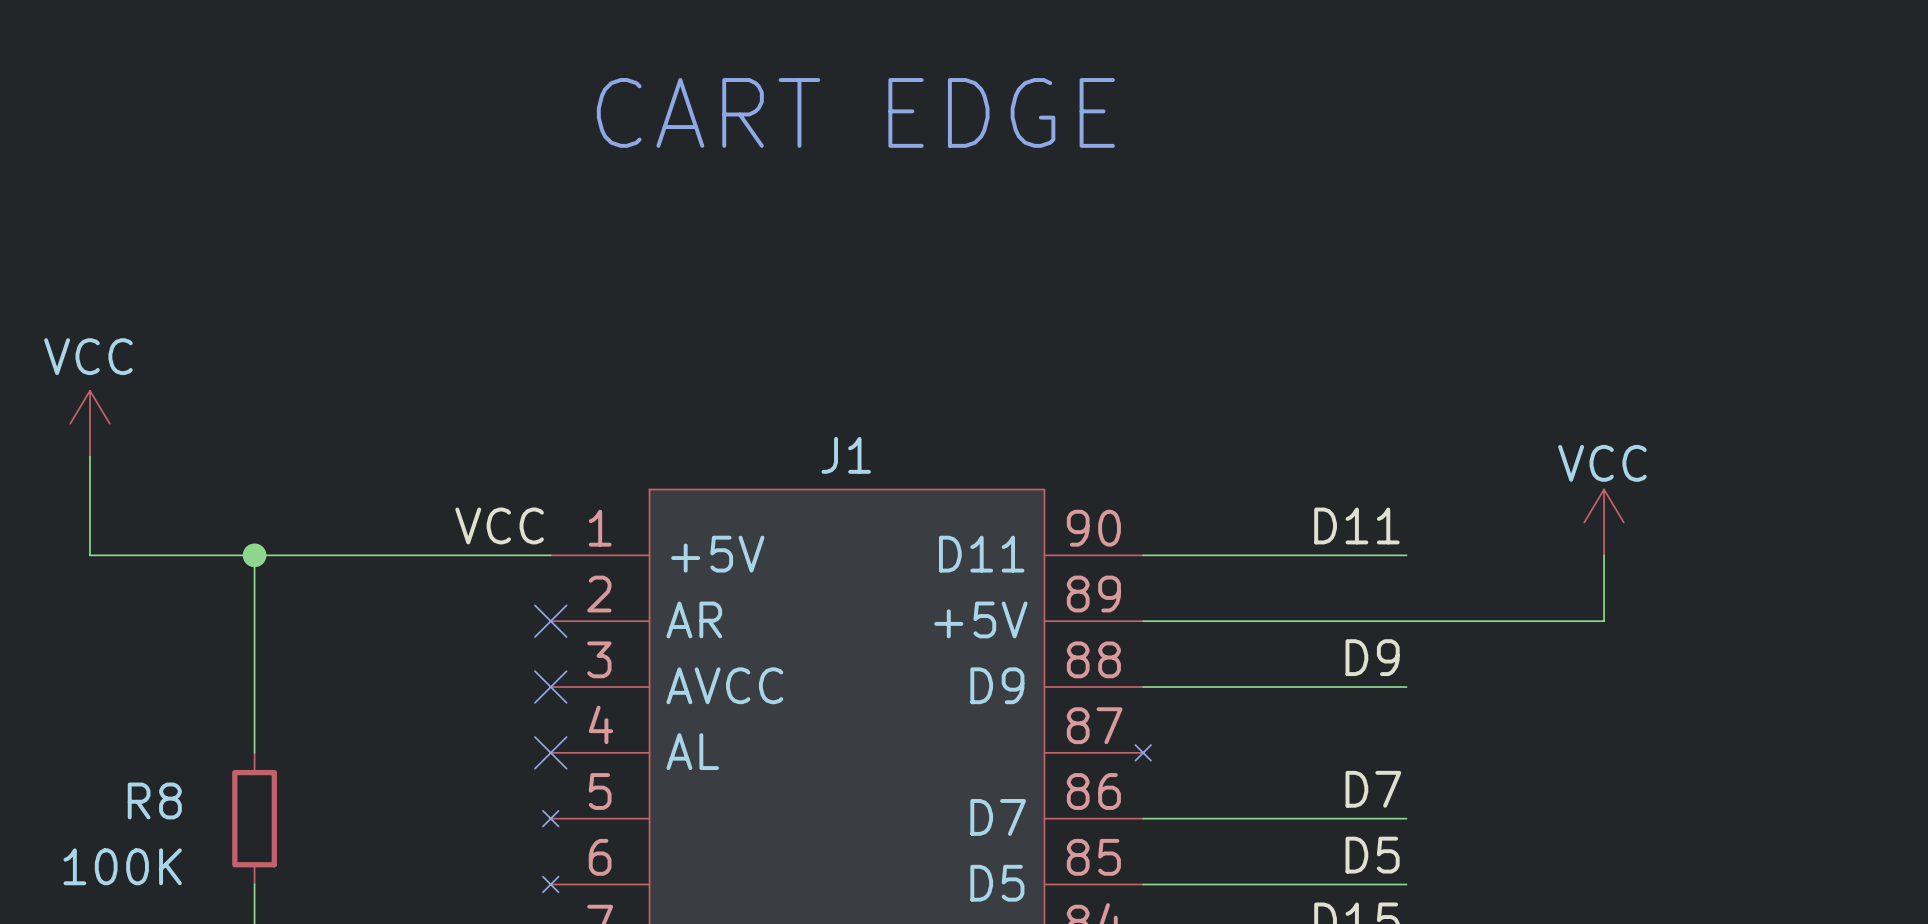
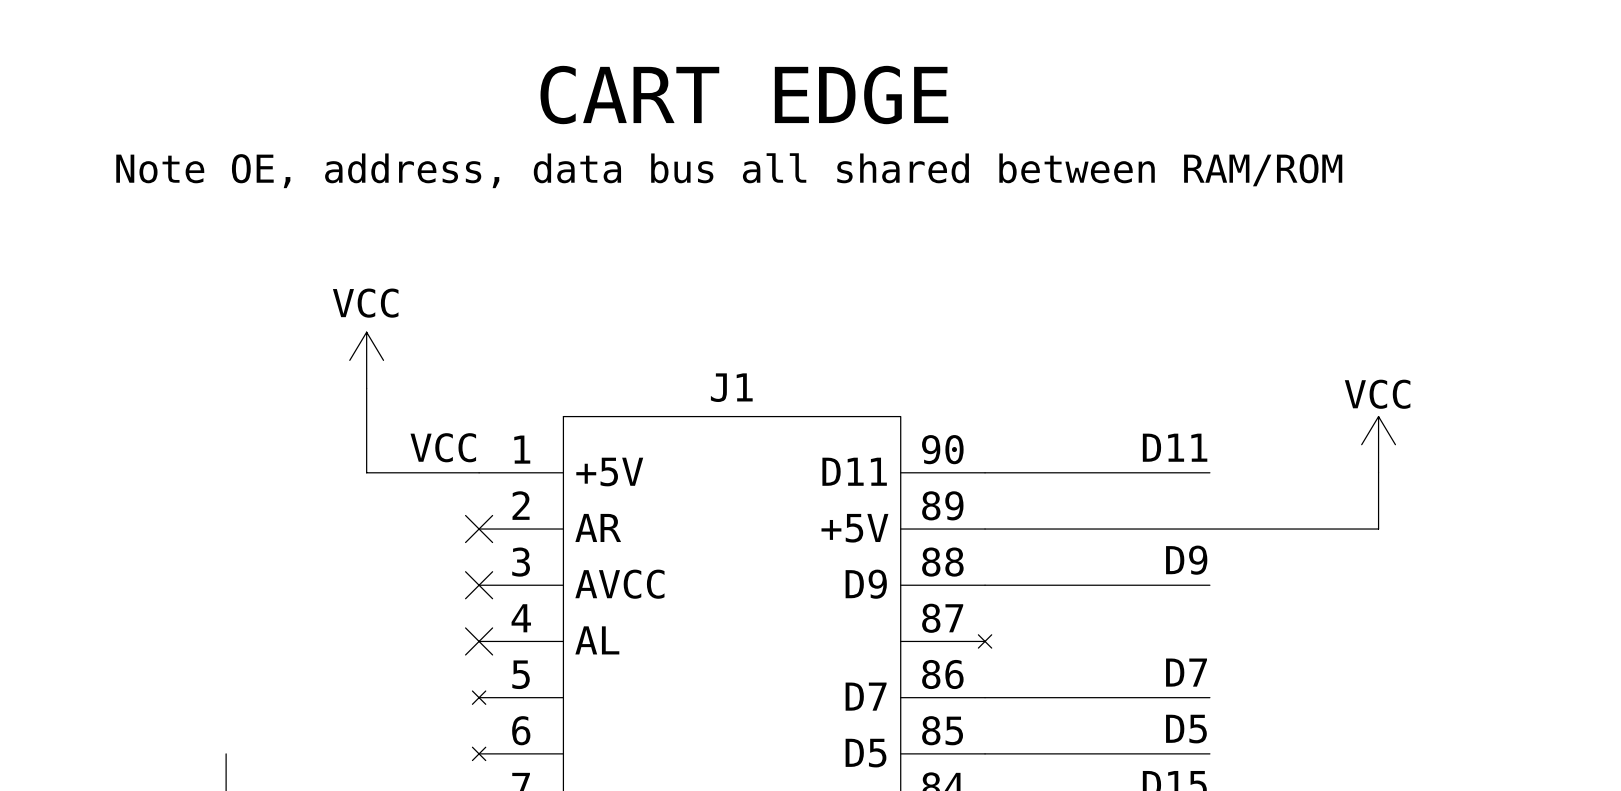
text position: CART EDGE (855, 112) -> CART EDGE (744, 95)
text: none -> Note OE, address, data bus all shared between RAM/ROM (729, 170)
power symbol position: VCC (89, 423) -> VCC (366, 360)
wire: (89, 456) (89, 555) (419, 555) -> (366, 388) (366, 472)
wire: (254, 555) (254, 752) -> none
junction: (254, 555) -> none
R8: 100K (254, 818) -> none

